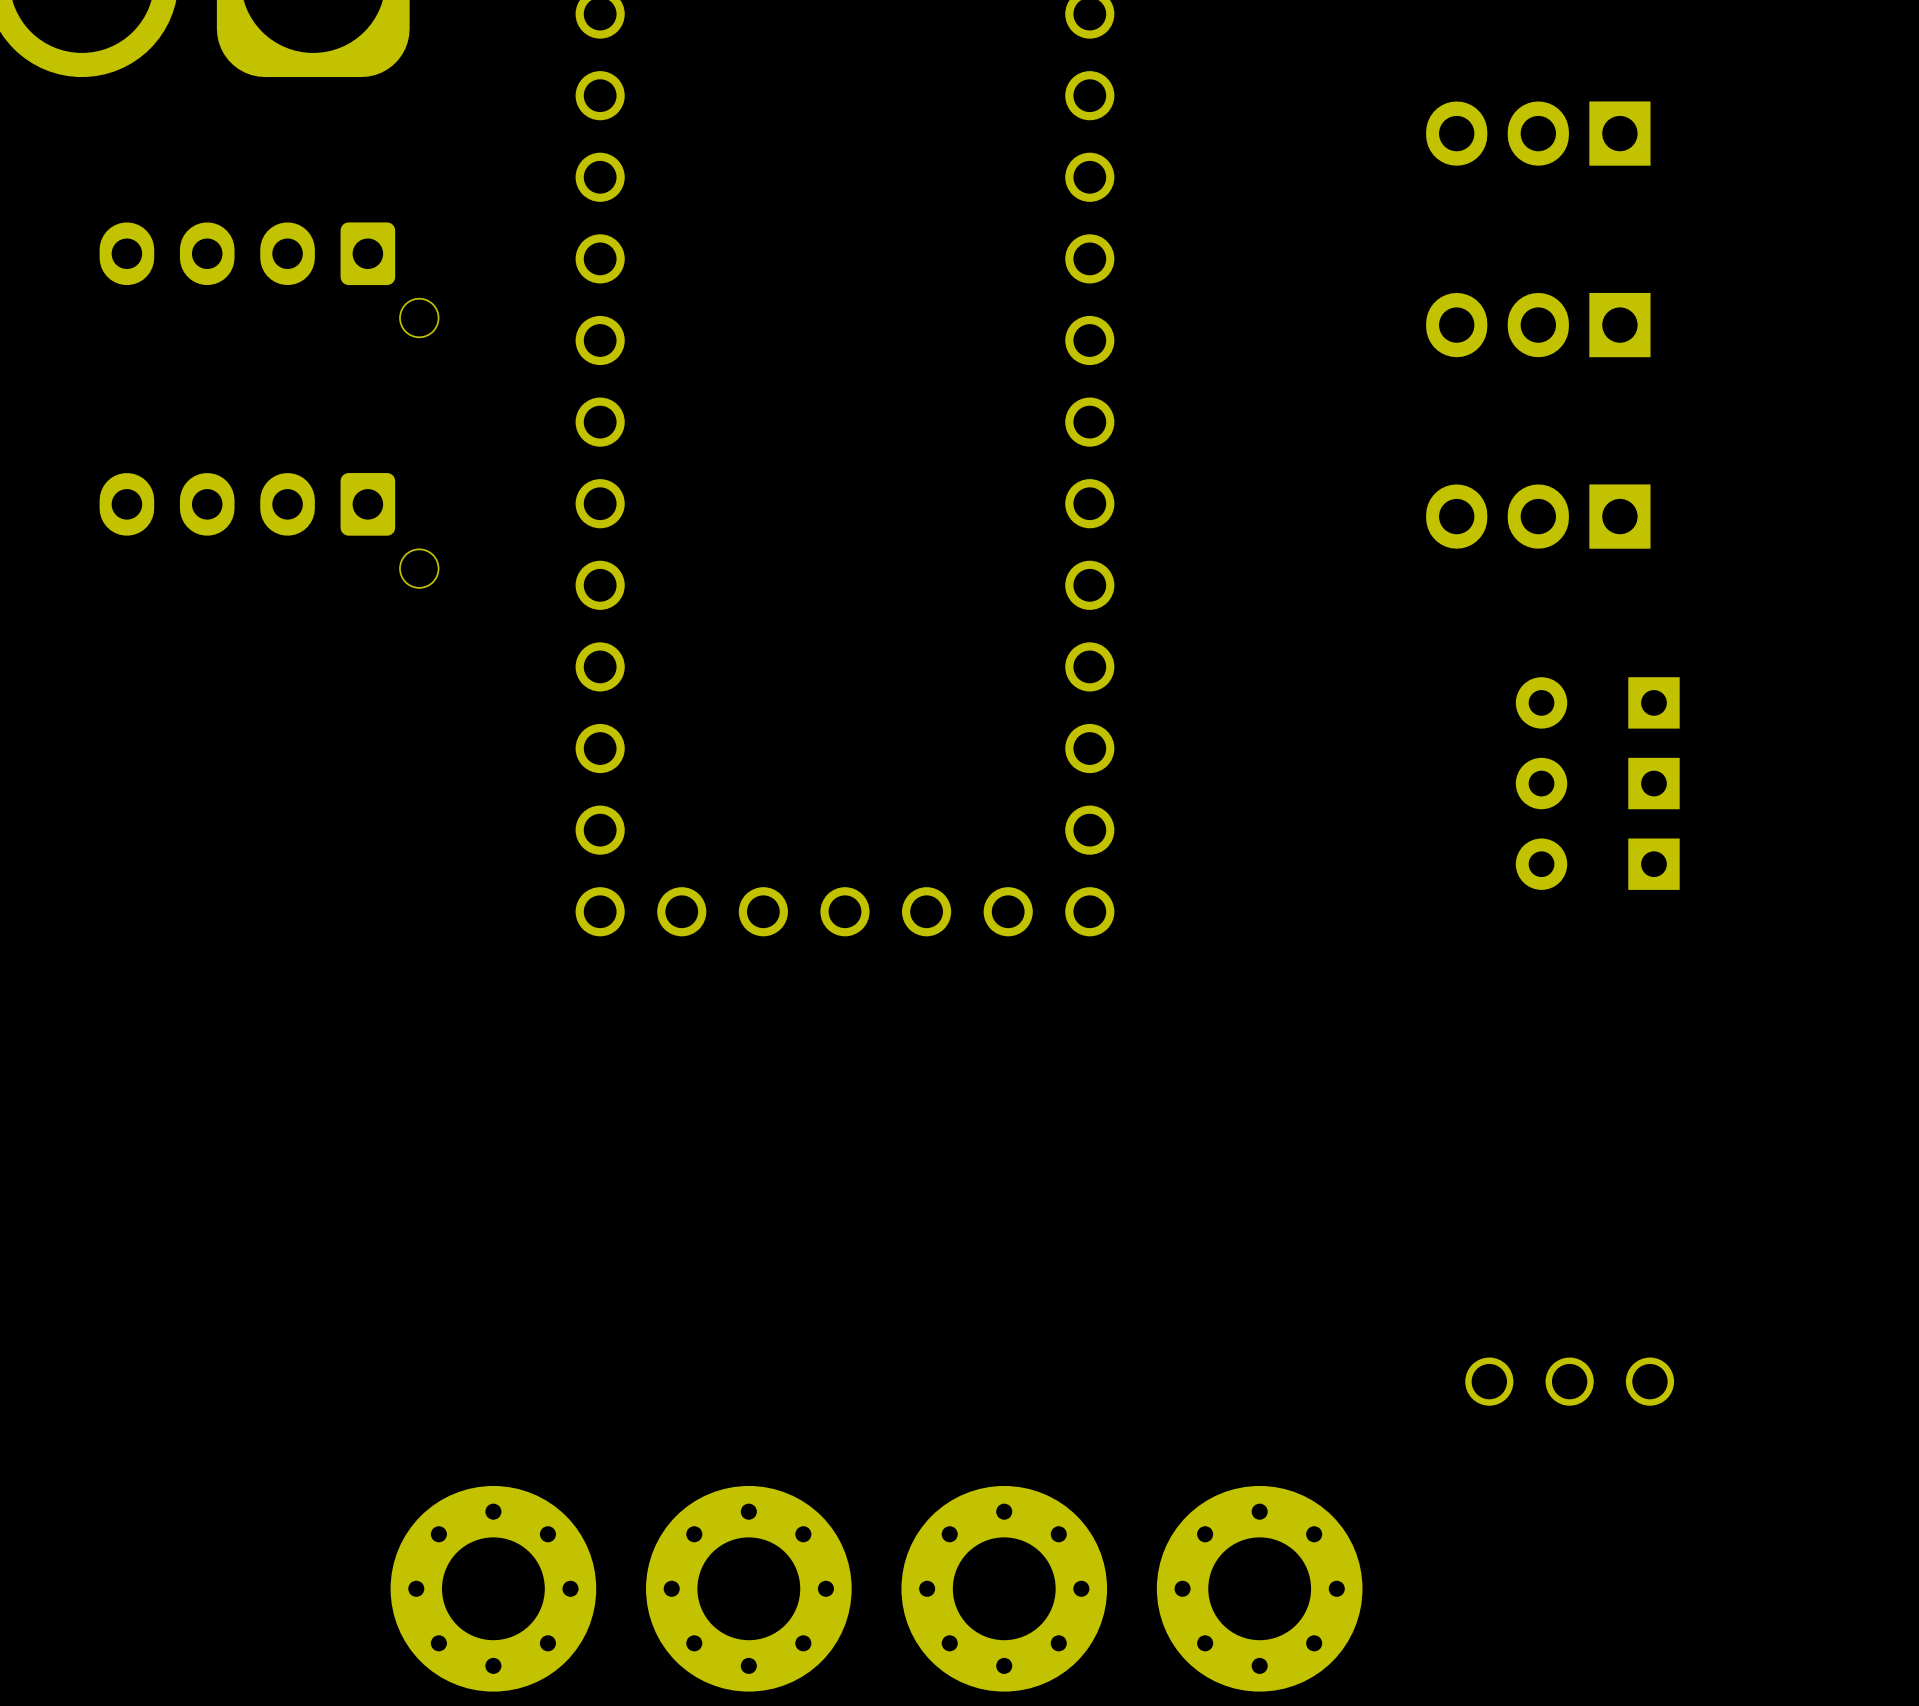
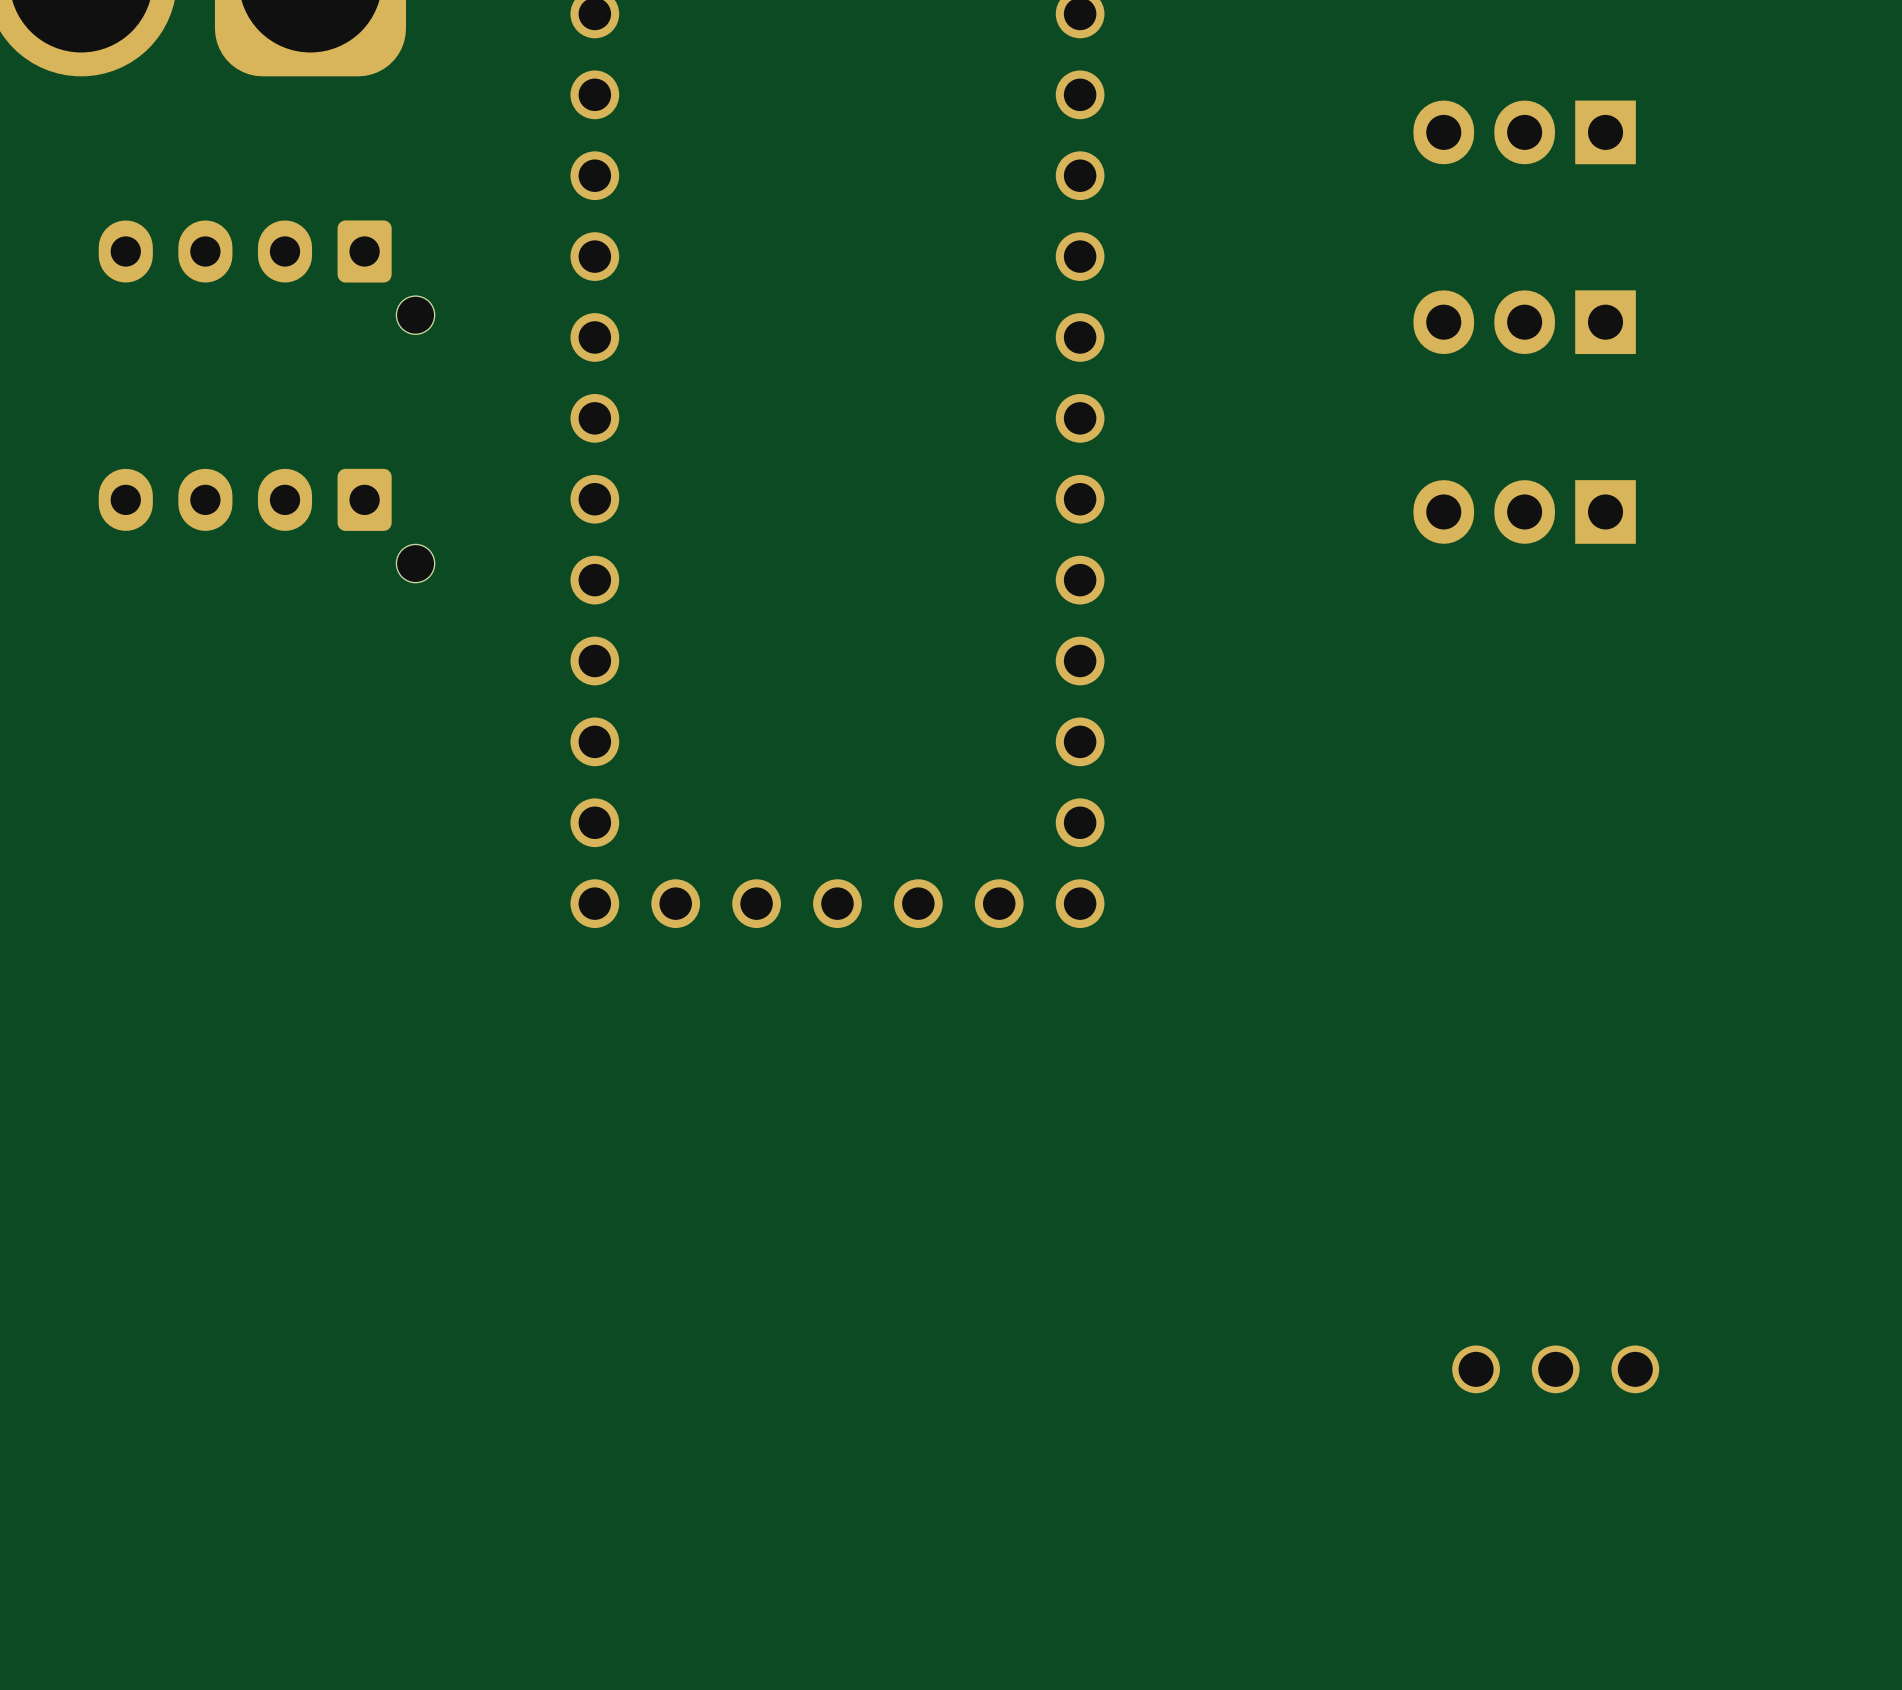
part: (1597, 702) -> none
part: (1597, 783) -> none
part: (1597, 864) -> none
part: (493, 1588) -> none
part: (748, 1588) -> none
part: (1004, 1588) -> none
part: (1259, 1588) -> none

